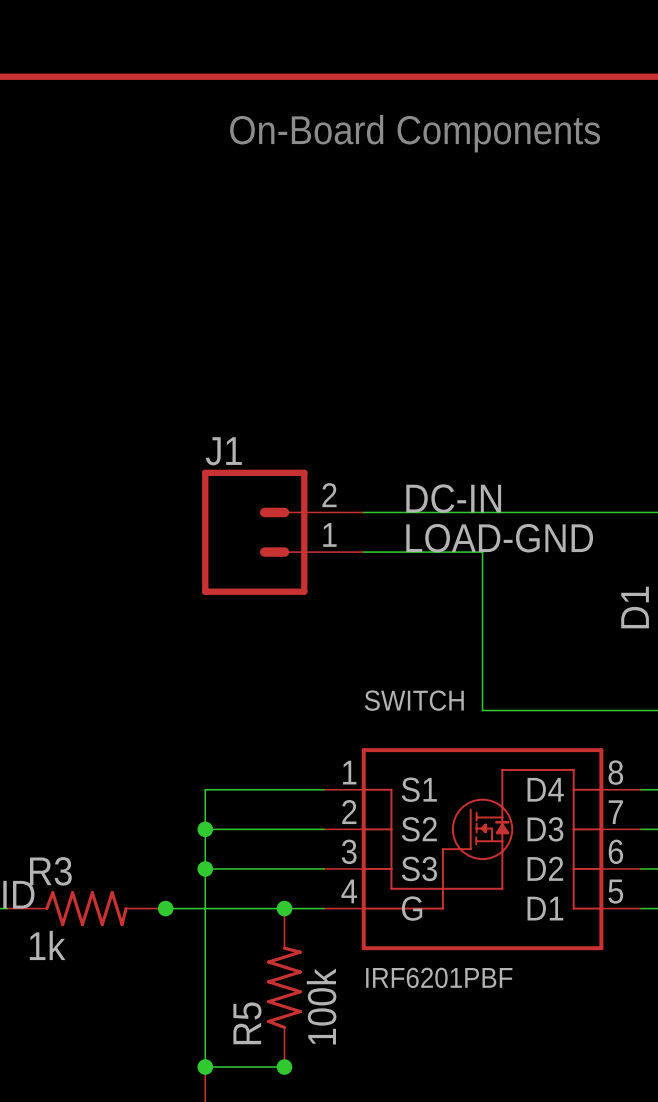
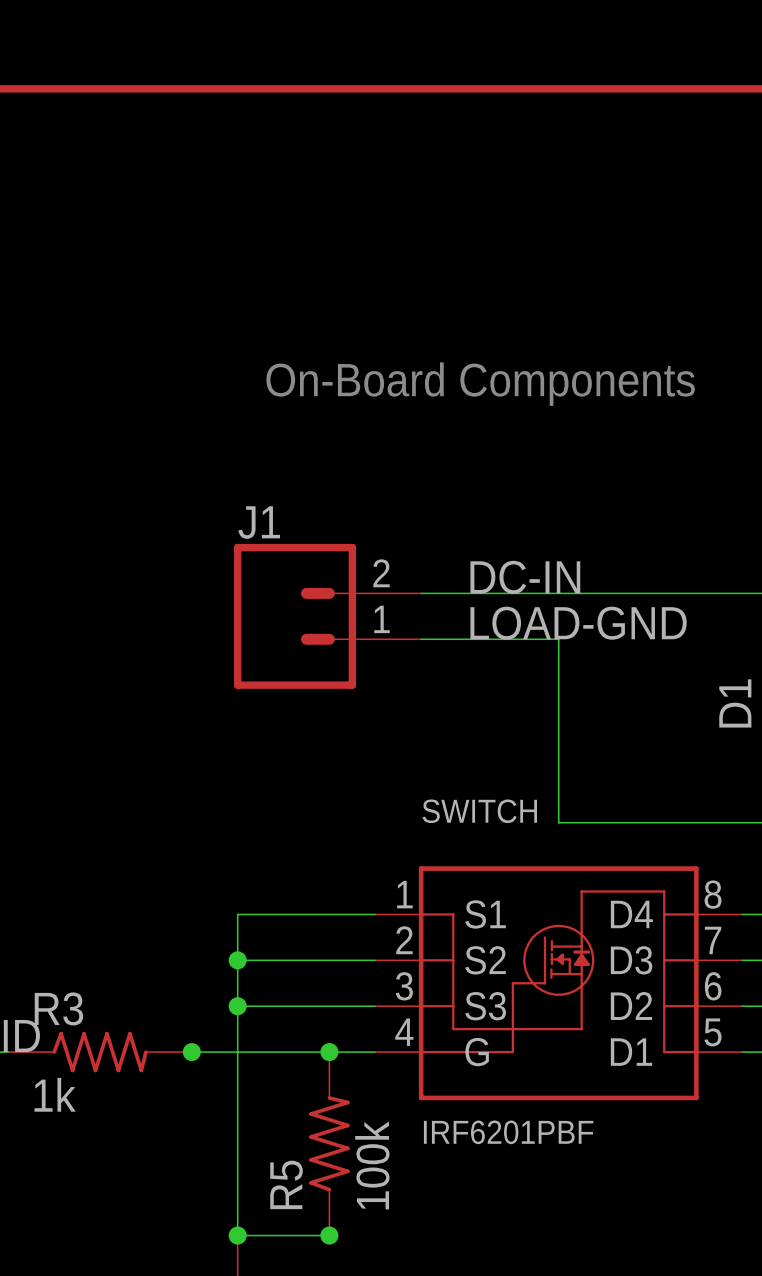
text position: On-Board Components (415, 133) -> On-Board Components (480, 384)

